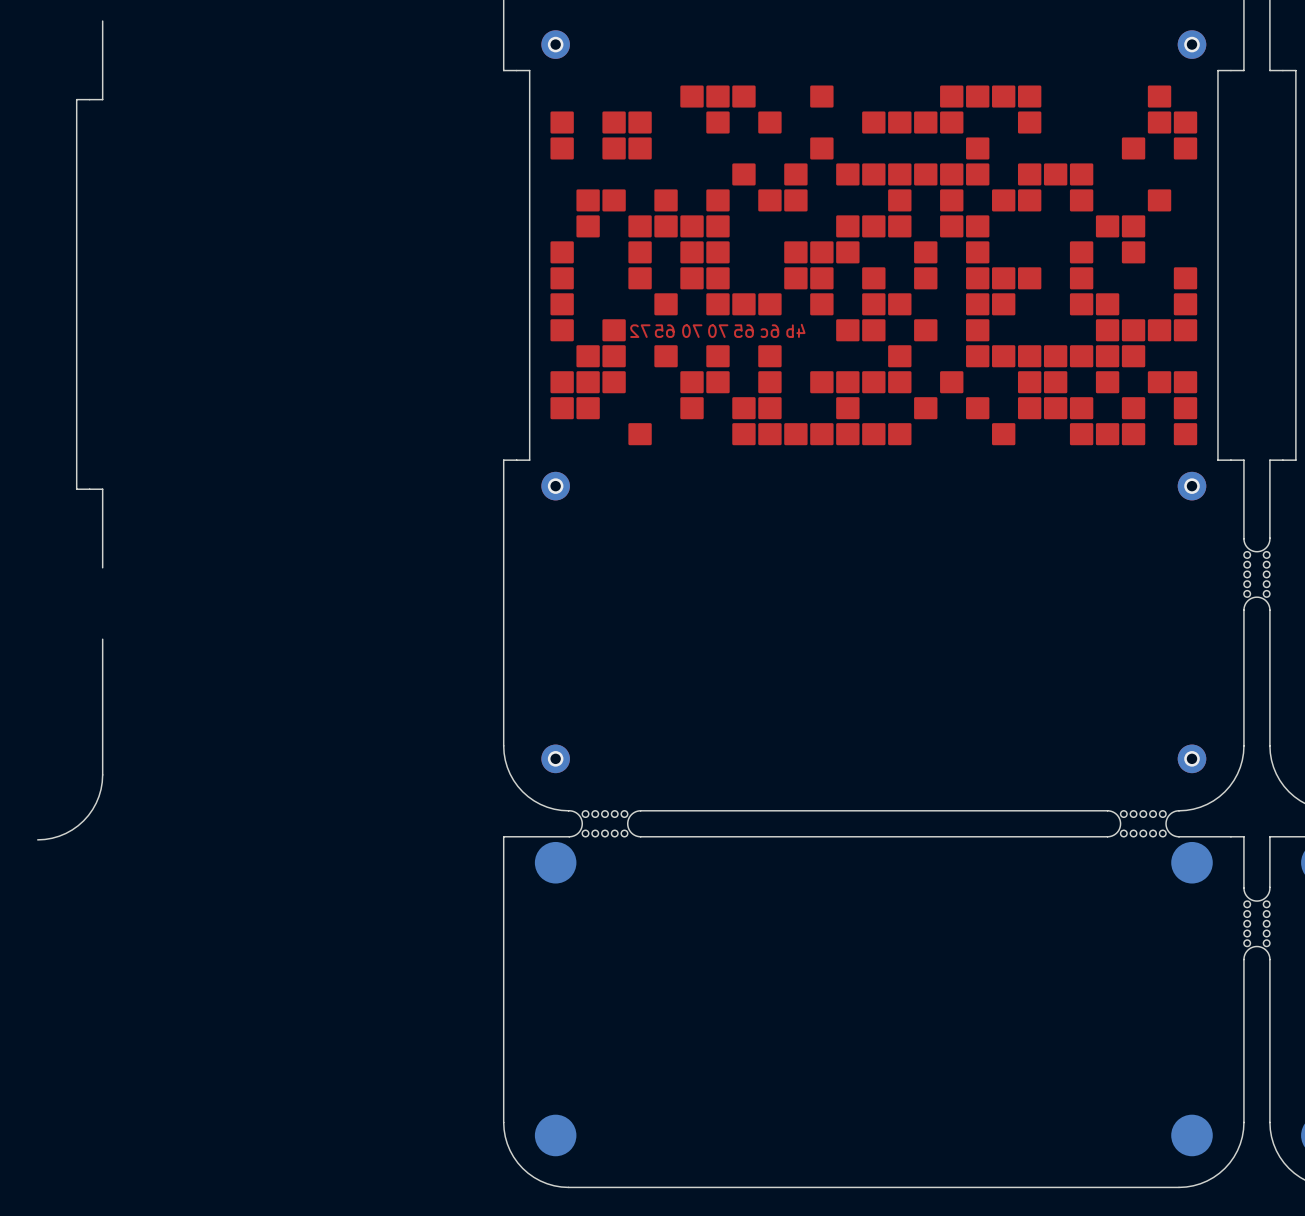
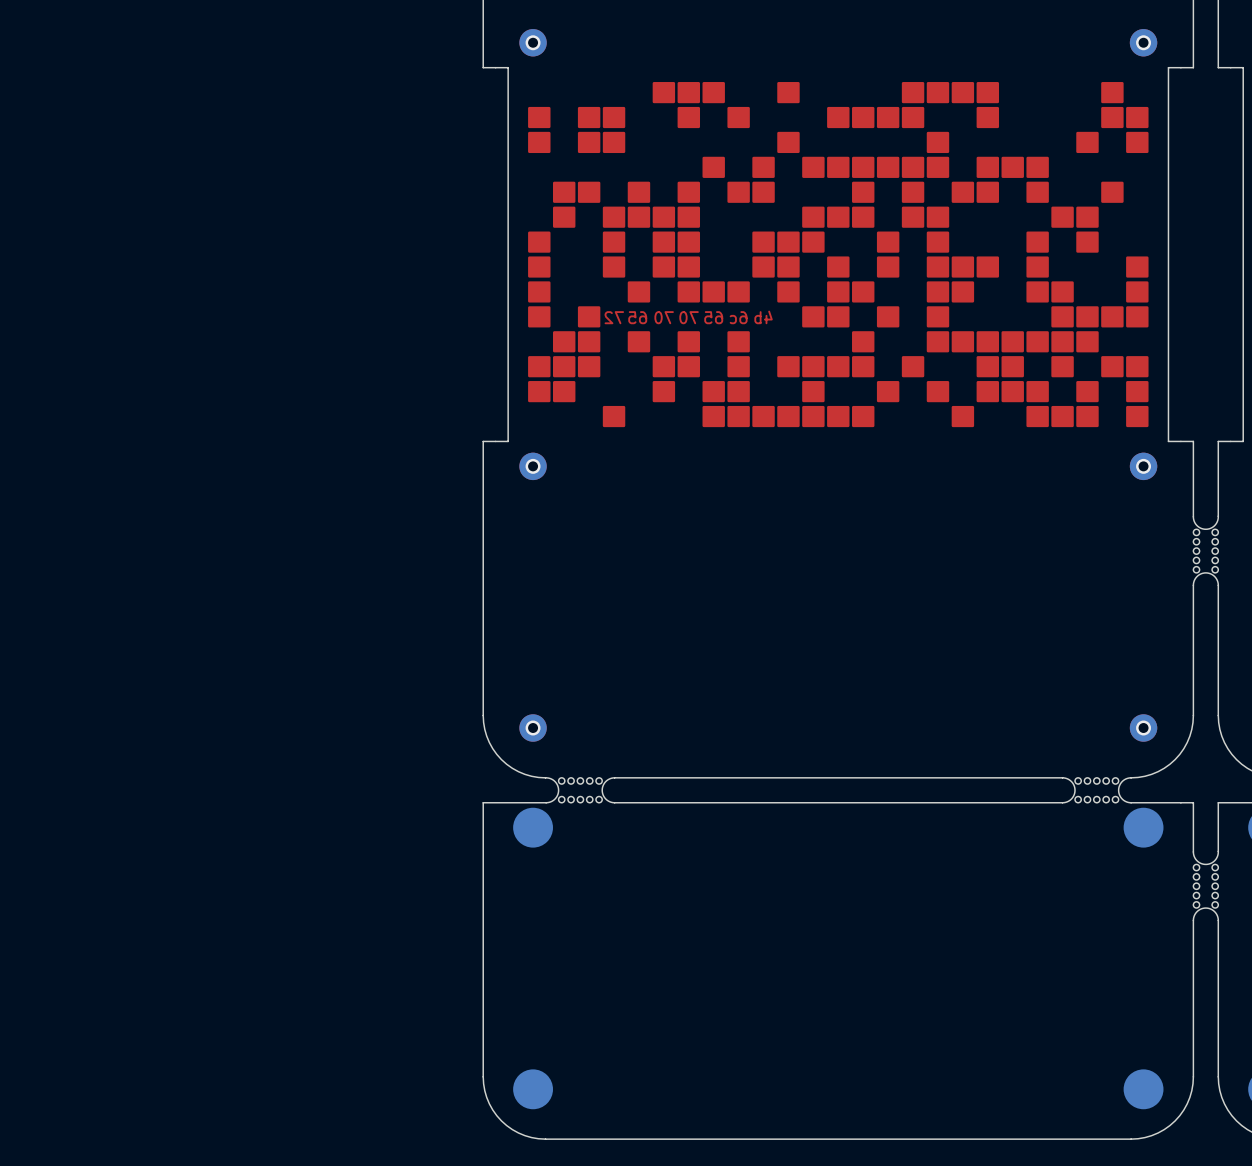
board edge: (102, 21) (102, 99) (76, 99) (76, 489) (102, 489) (102, 567) -> none
board edge: (102, 639) (102, 774) (99, 796) (92, 809) (78, 825) (59, 836) (37, 839) -> none

